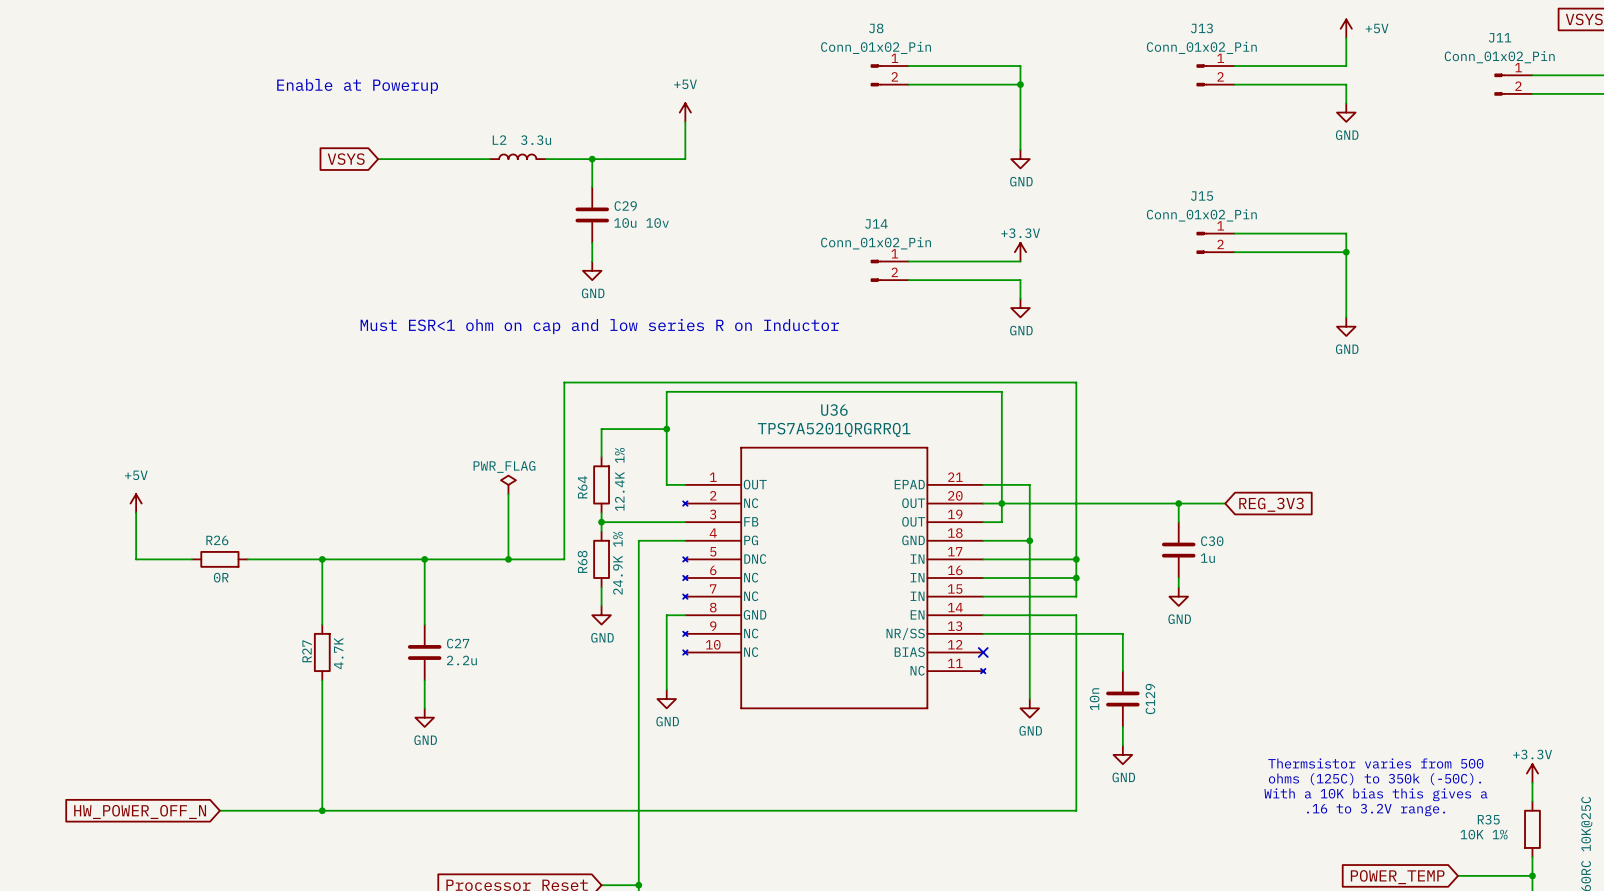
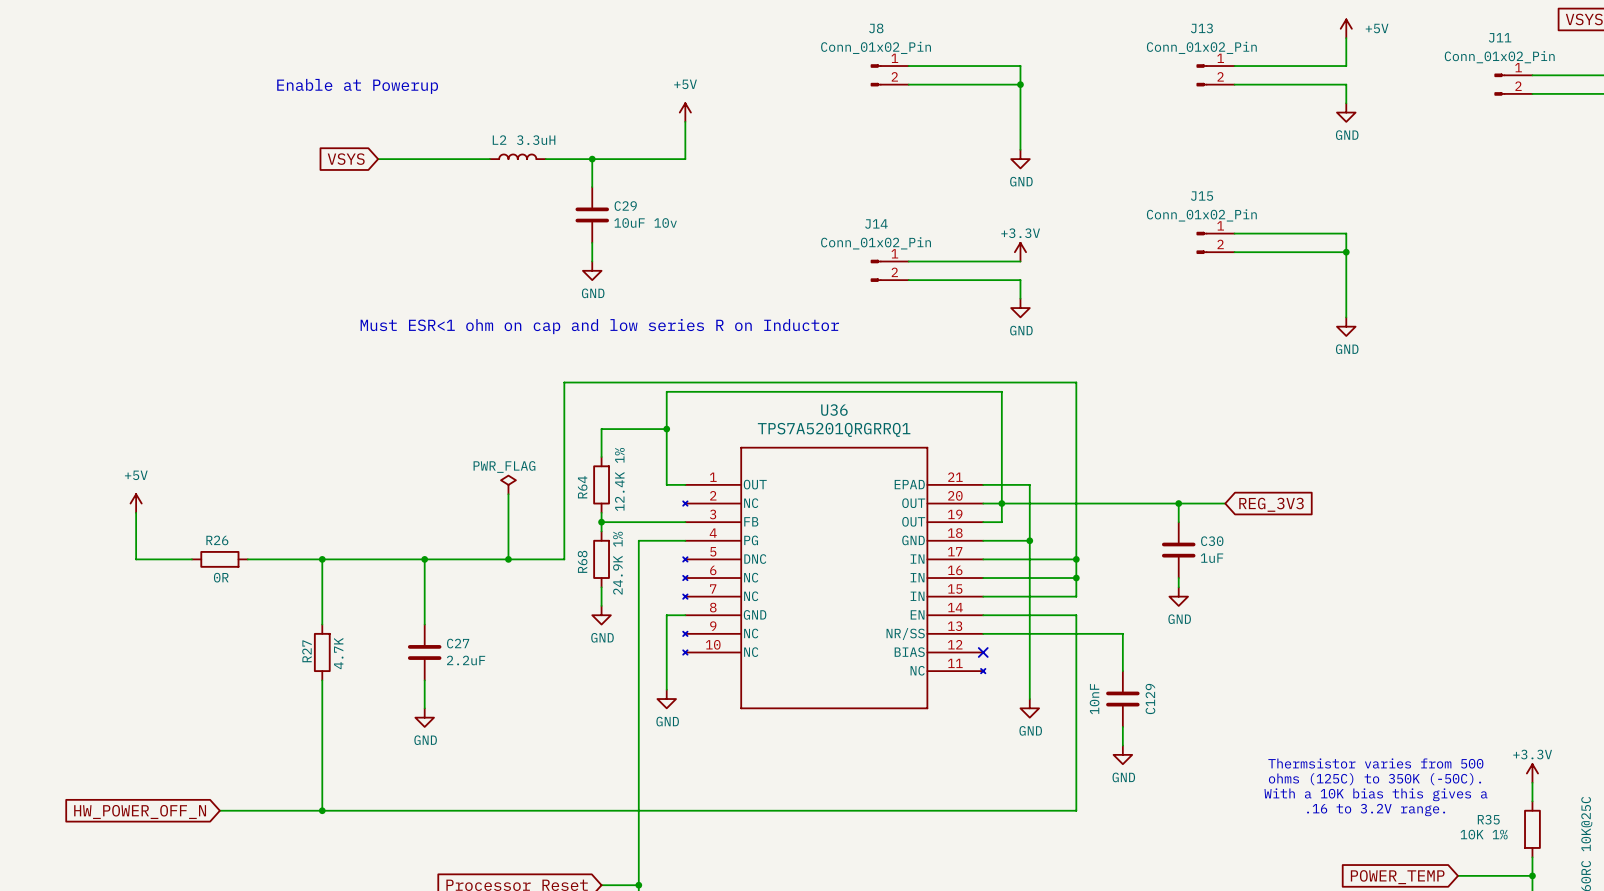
L2 value: 3.3u (536, 140) -> 3.3uH (536, 140)
C29 value: 10u 10v (641, 222) -> 10uF 10v (645, 222)
C30 value: 1u (1207, 558) -> 1uF (1212, 558)
C27 value: 2.2u (461, 660) -> 2.2uF (466, 660)
C129 value: 10n (1094, 699) -> 10nF (1094, 699)
text: ohms (125C) to 350k (-50C). (1375, 779) -> ohms (125C) to 350K (-50C). (1375, 779)

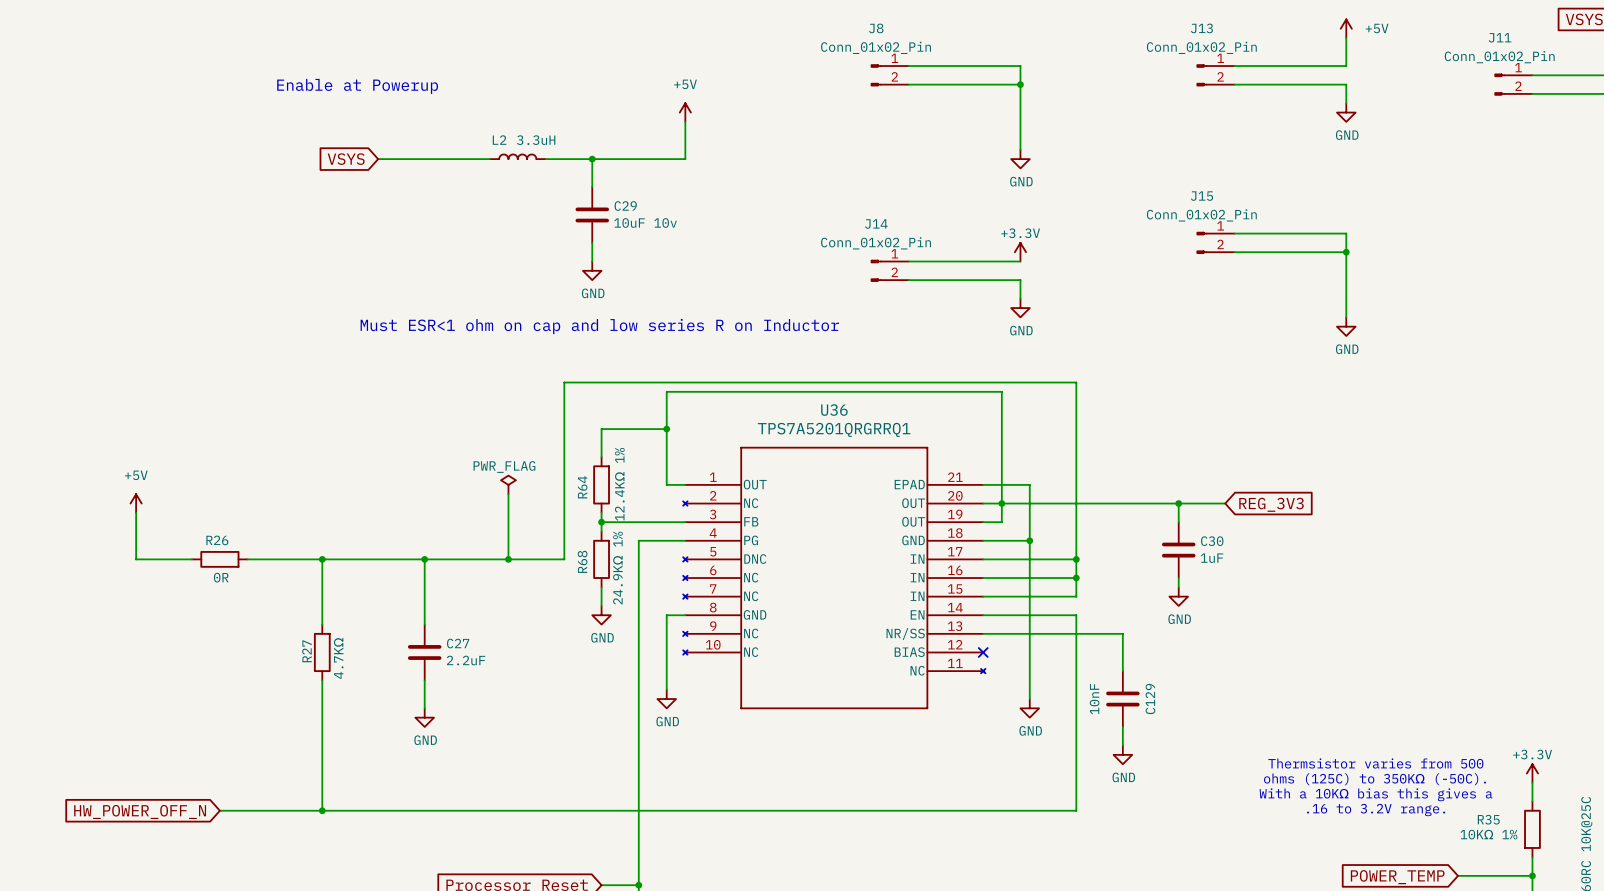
R64 value: 12.4K 1% (619, 479) -> 12.4KΩ 1% (619, 484)
R68 value: 24.9K 1% (617, 563) -> 24.9KΩ 1% (617, 568)
R27 value: 4.7K (338, 653) -> 4.7KΩ (338, 658)
text: ohms (125C) to 350K (-50C). (1375, 779) -> ohms (125C) to 350KΩ (-50C). (1375, 779)
text: With a 10K bias this gives a (1375, 794) -> With a 10KΩ bias this gives a (1375, 794)
R35 value: 10K 1% (1484, 834) -> 10KΩ 1% (1488, 834)

